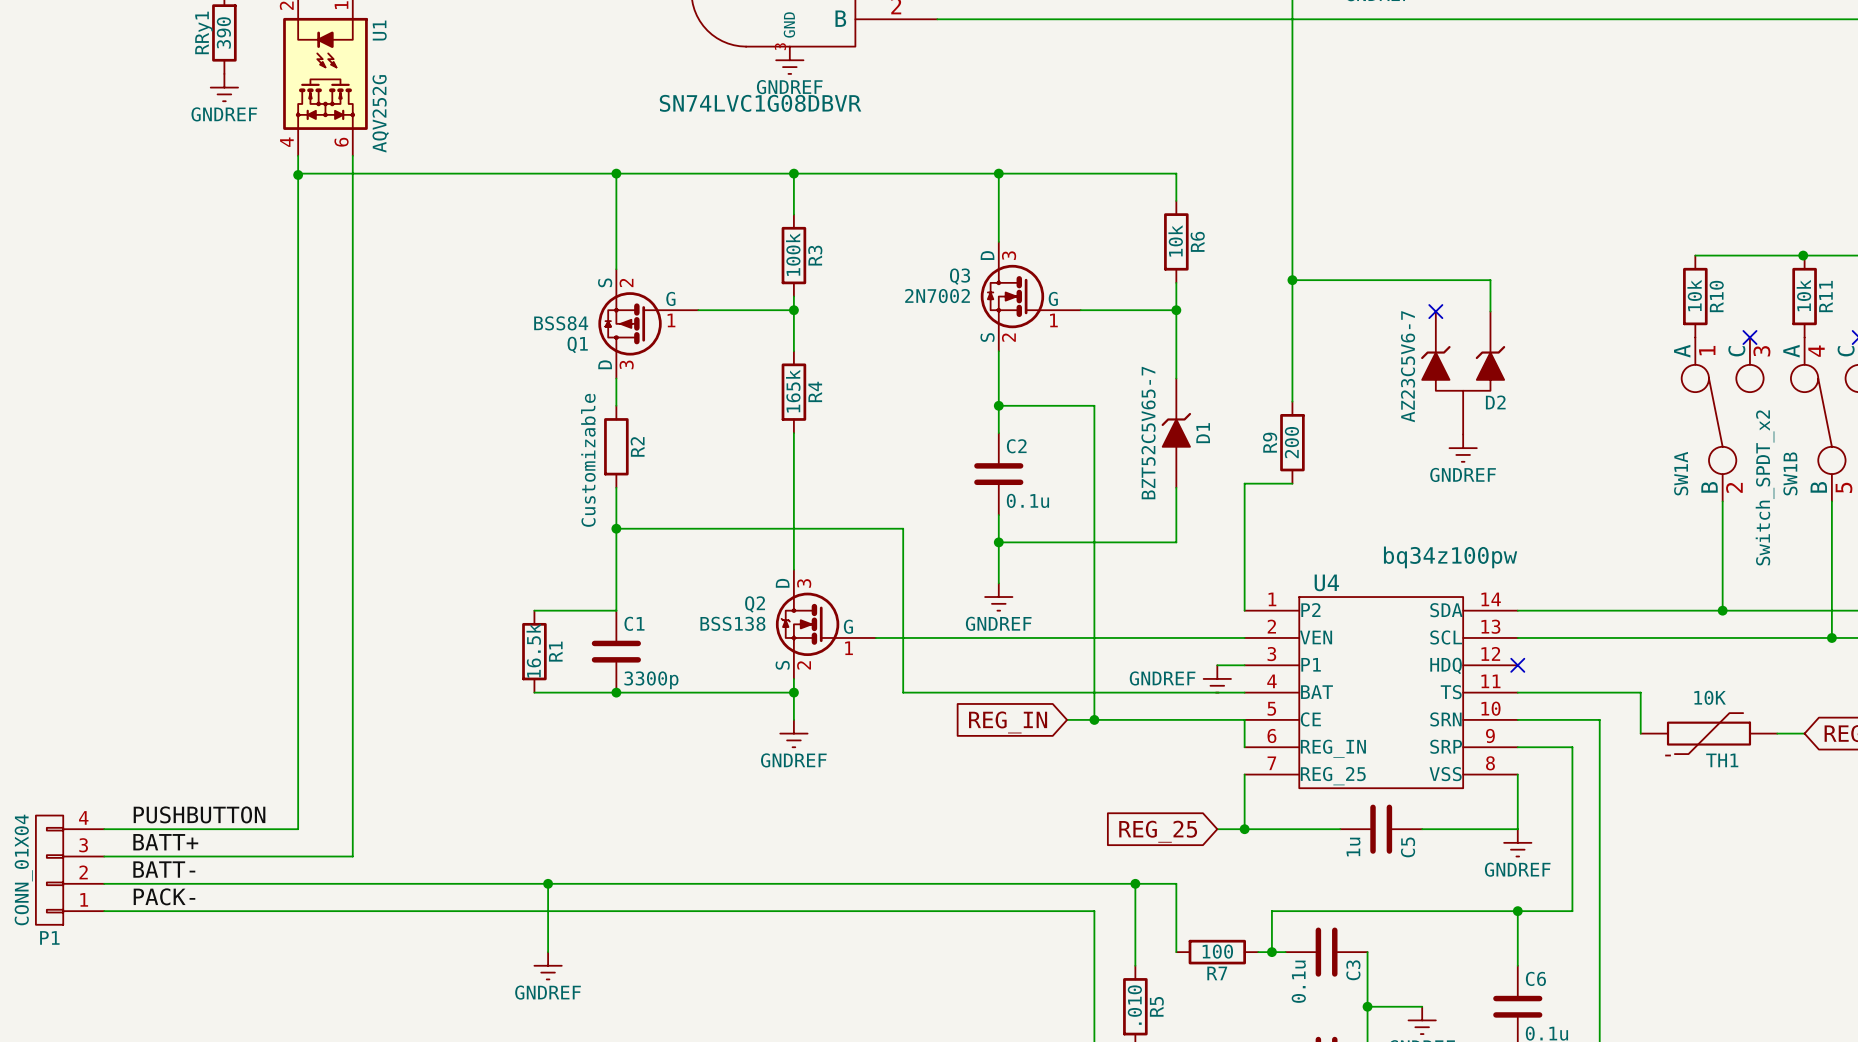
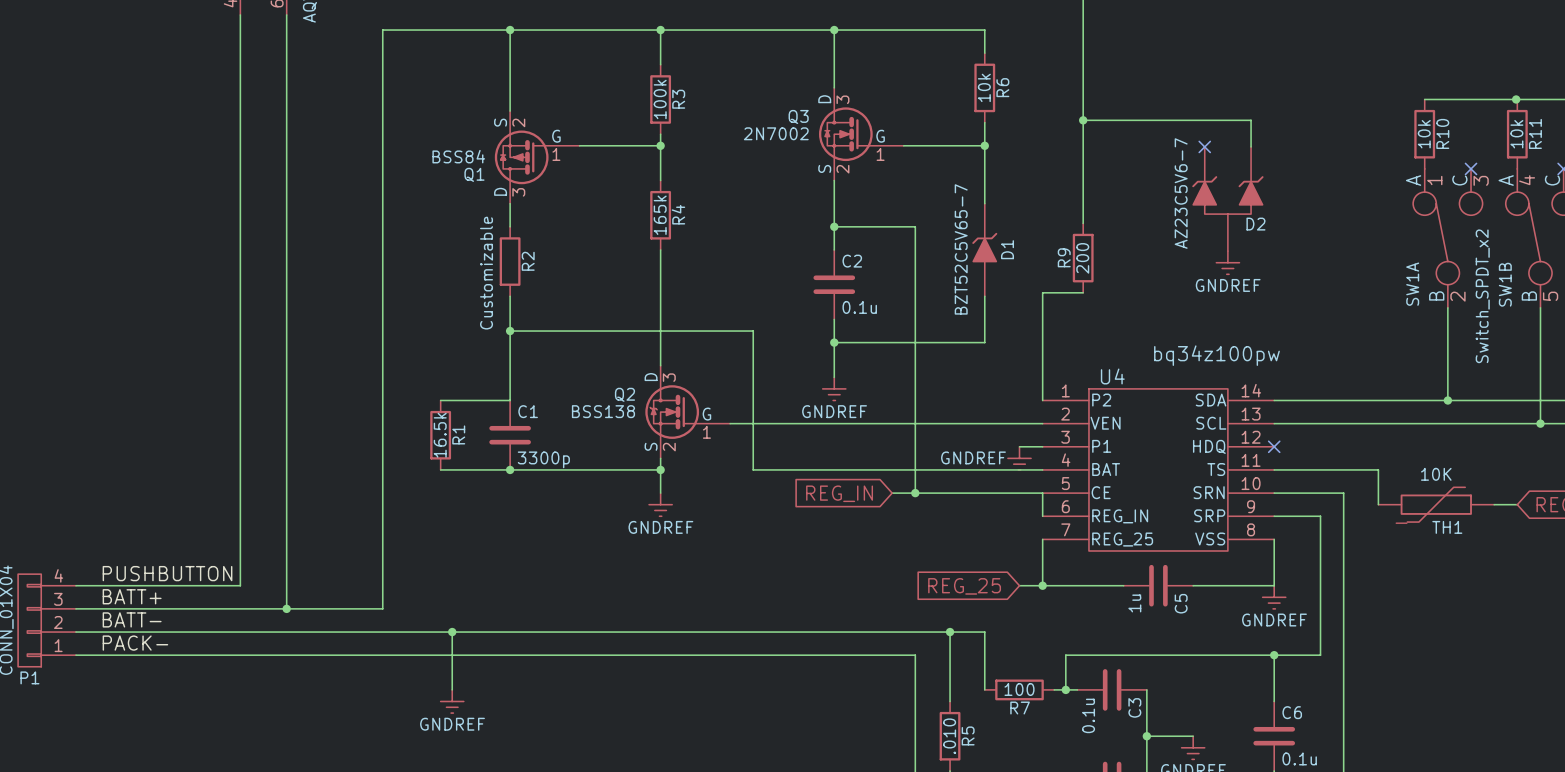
wire: (298, 173) (466, 173) -> (286, 608) (382, 608) (382, 30)
junction: (298, 174) -> none
junction: none -> (286, 608)

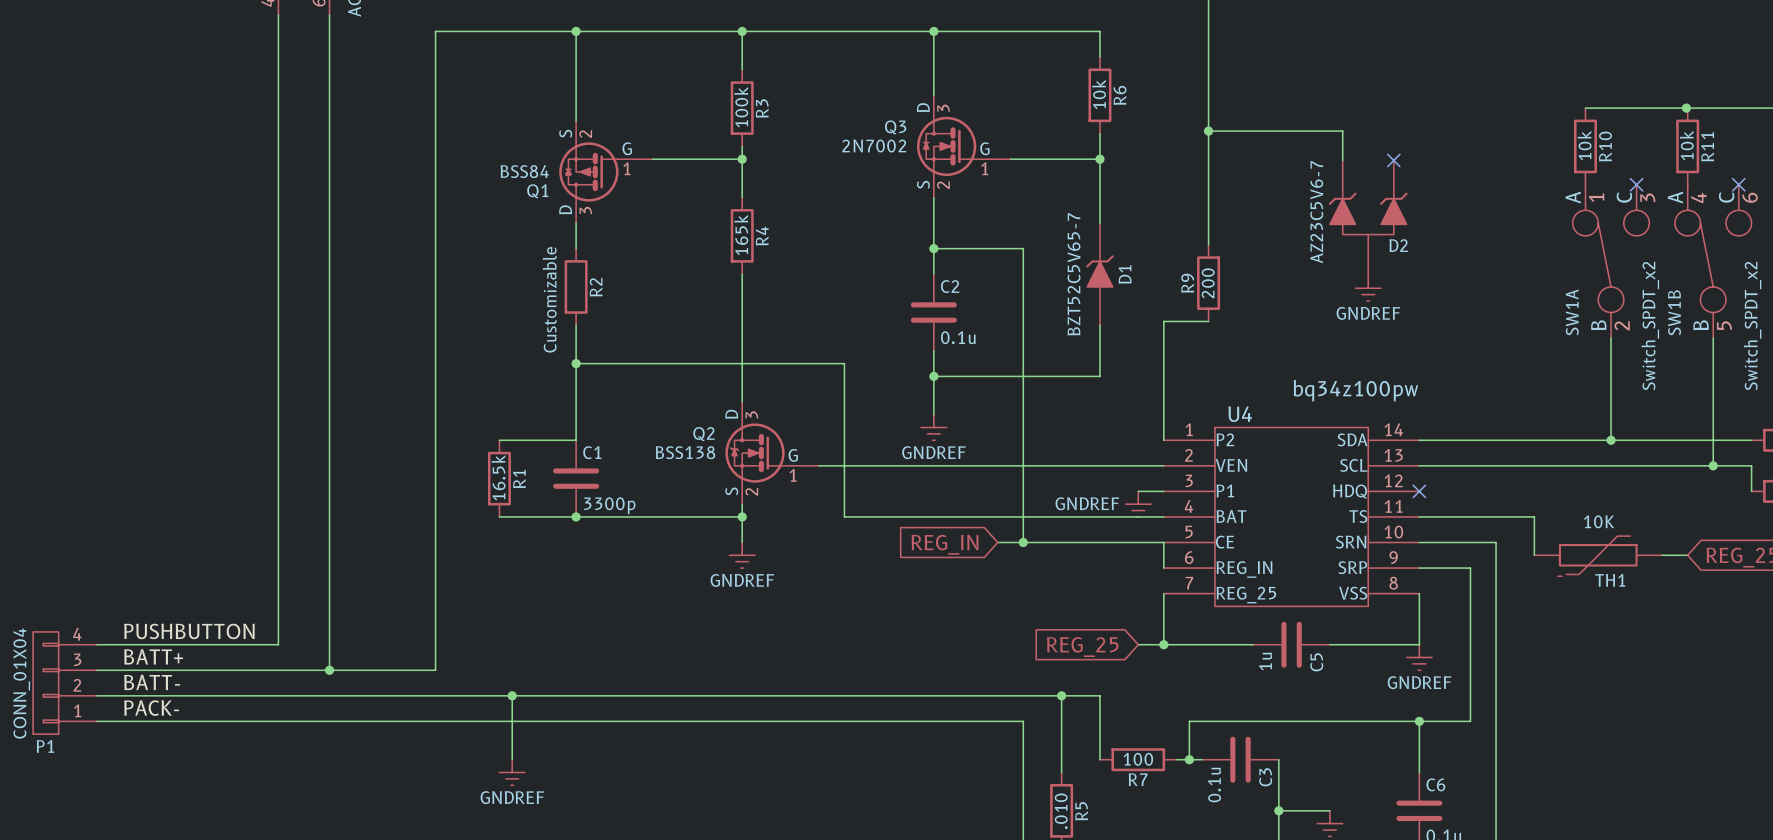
wire: (1204, 120) (1251, 120) (1251, 146) -> (1342, 131) (1342, 160)
no-connect mark position: (1204, 146) -> (1393, 160)

